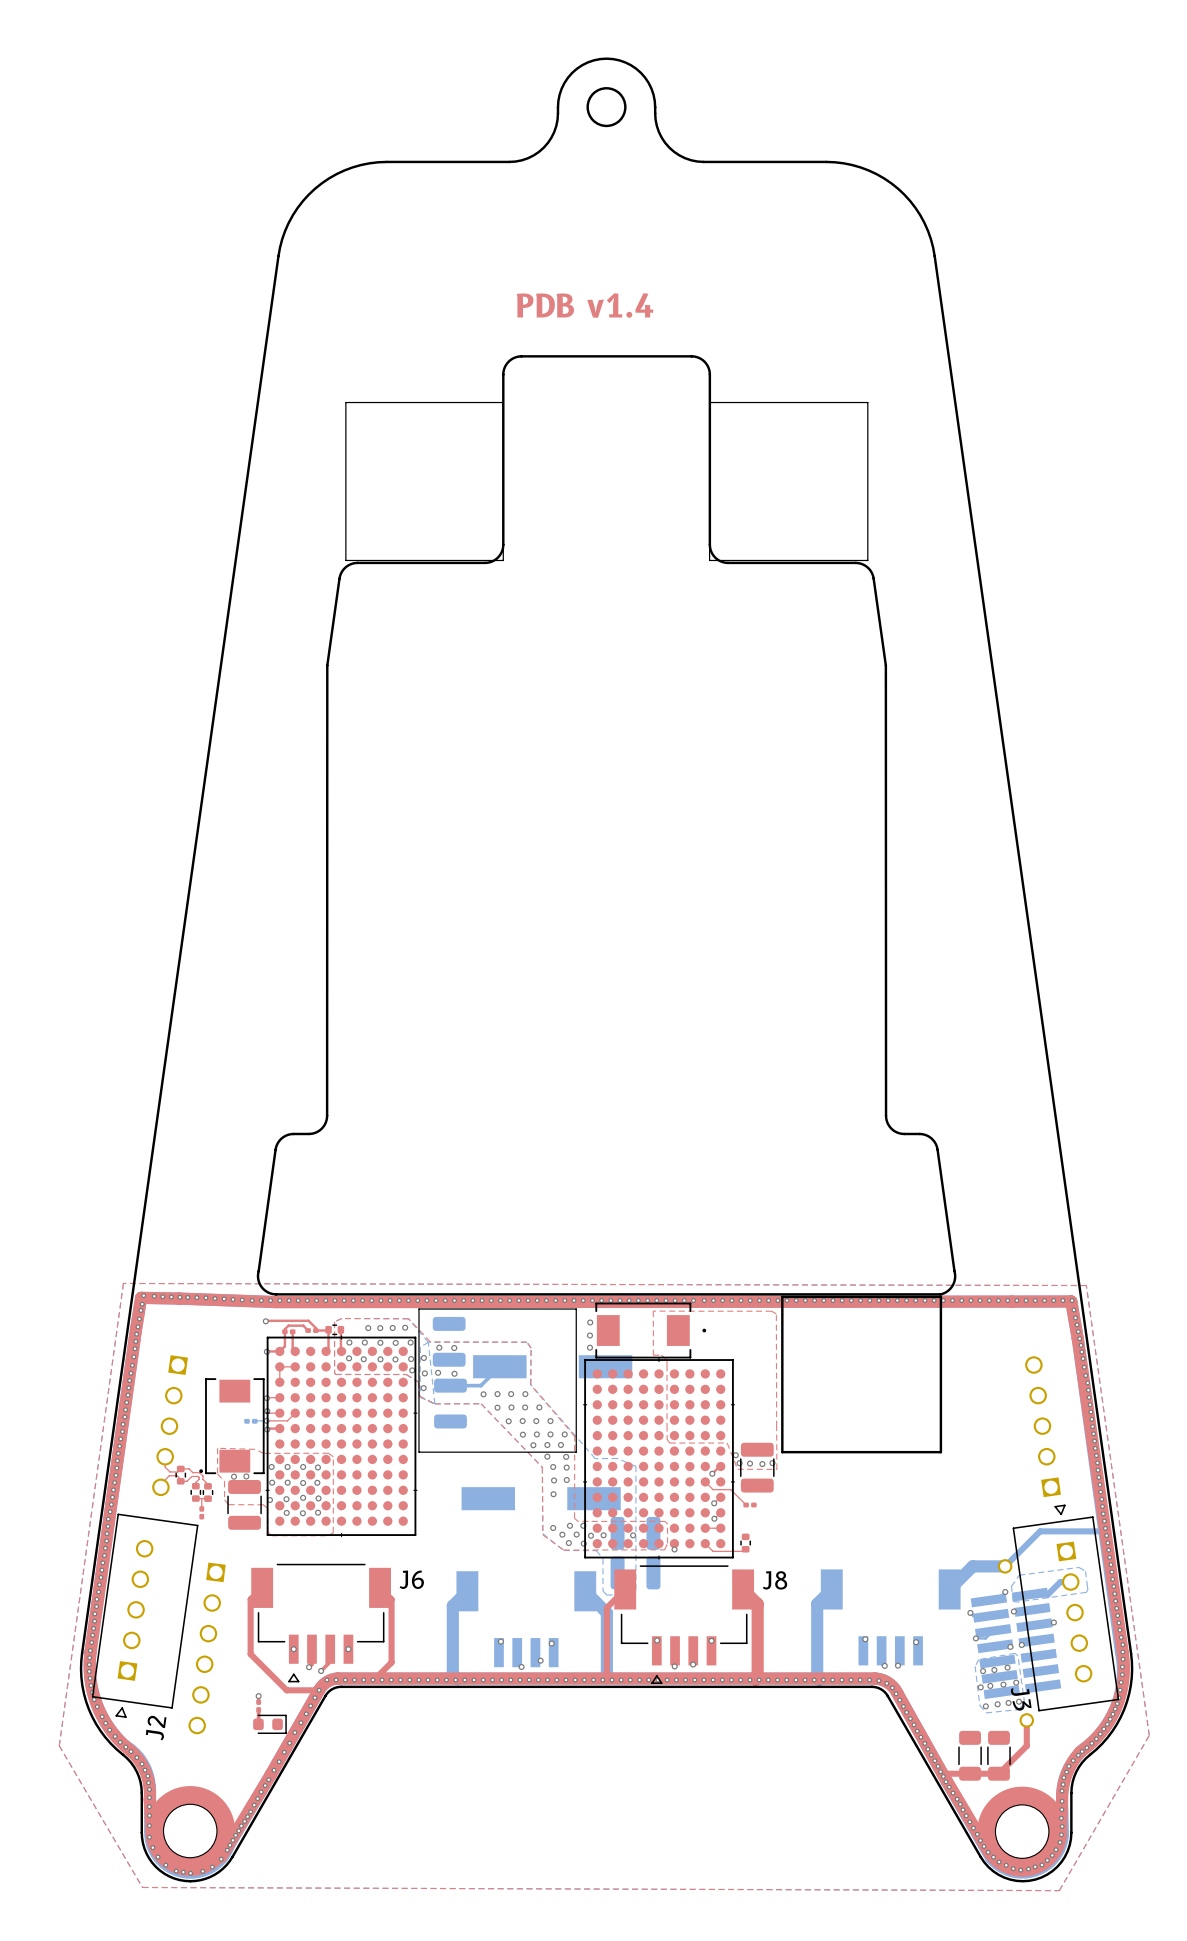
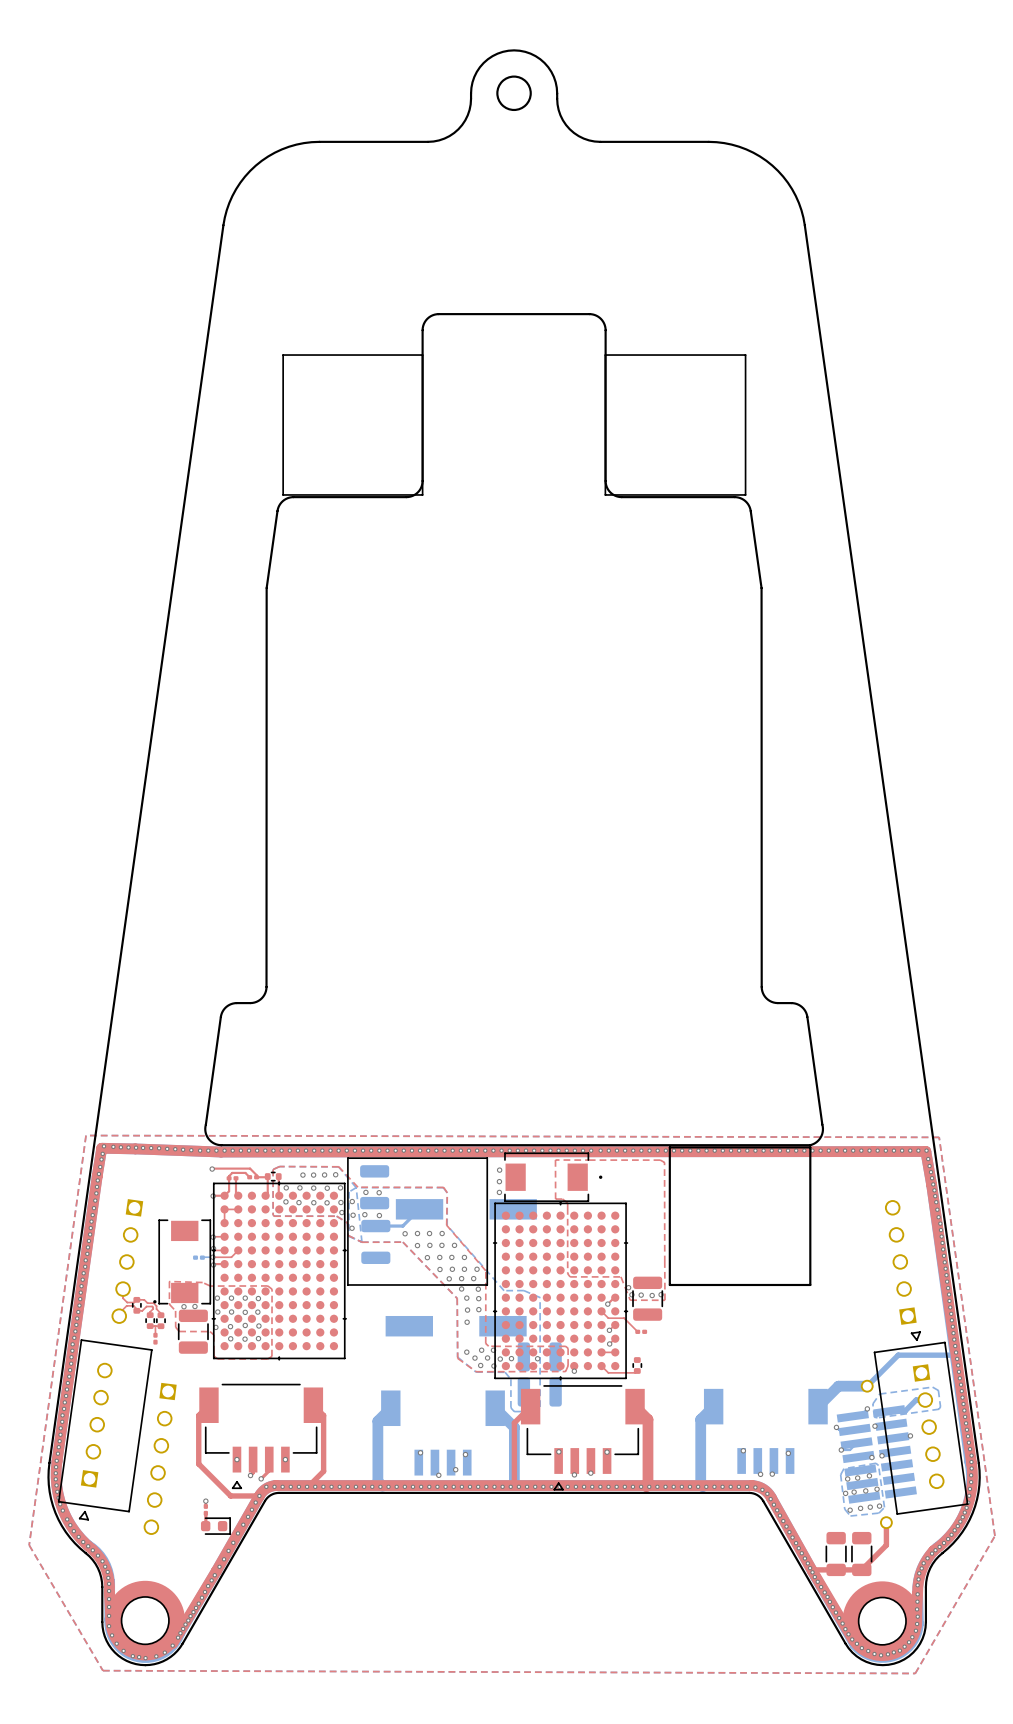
text: PDB v1.4 (585, 305) -> none
J6 name: J6 (411, 1579) -> none
J8 name: J8 (775, 1580) -> none
J3 name: J3 (1021, 1699) -> none
J2 name: J2 (156, 1728) -> none

